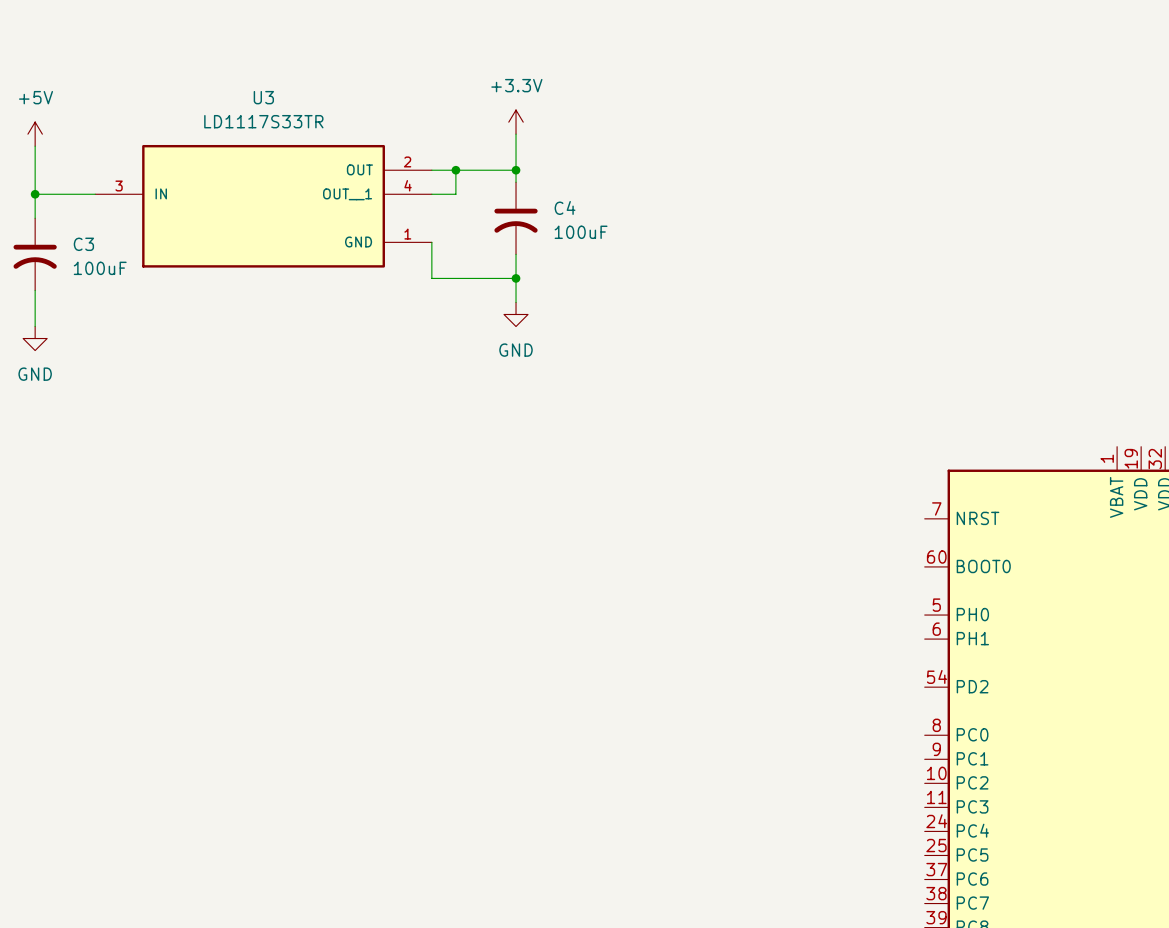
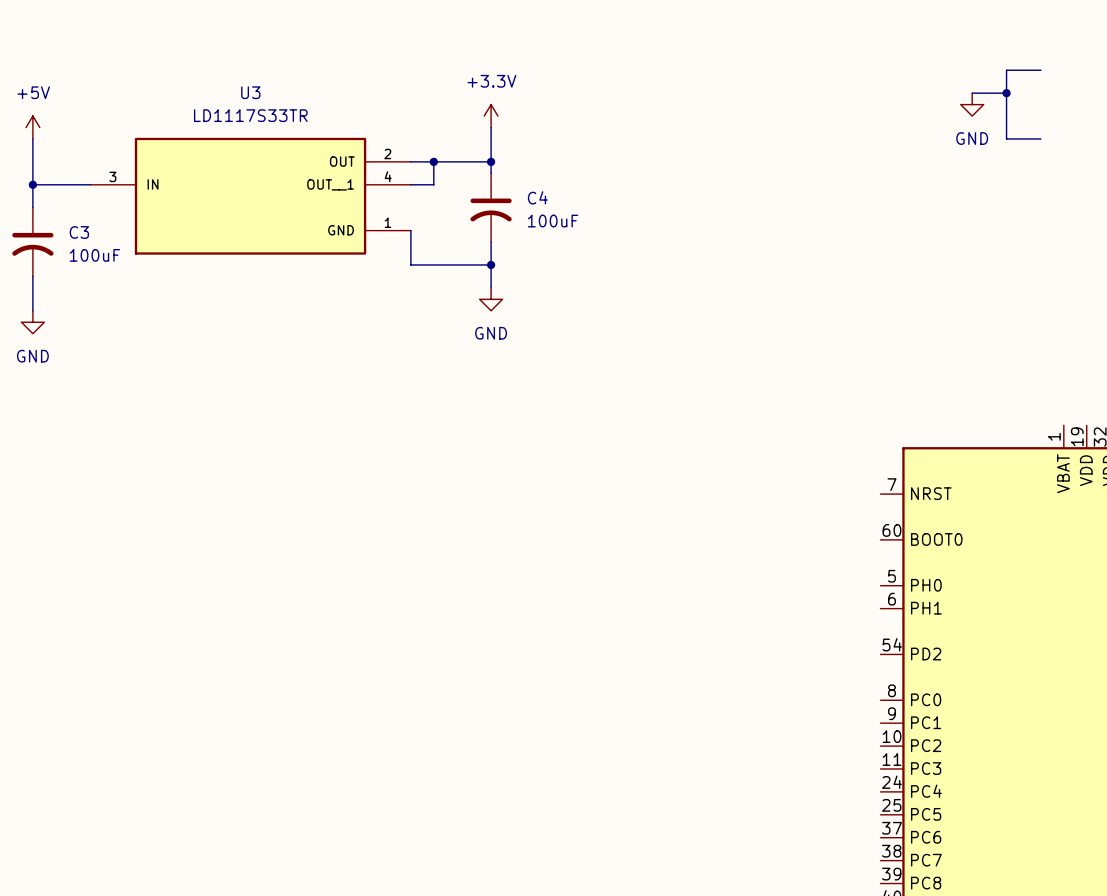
wire: none -> (1040, 70) (1006, 70) (1006, 138) (1040, 138)
wire: none -> (972, 93) (1006, 93)
junction: none -> (1006, 93)
power symbol: none -> GND (972, 104)

